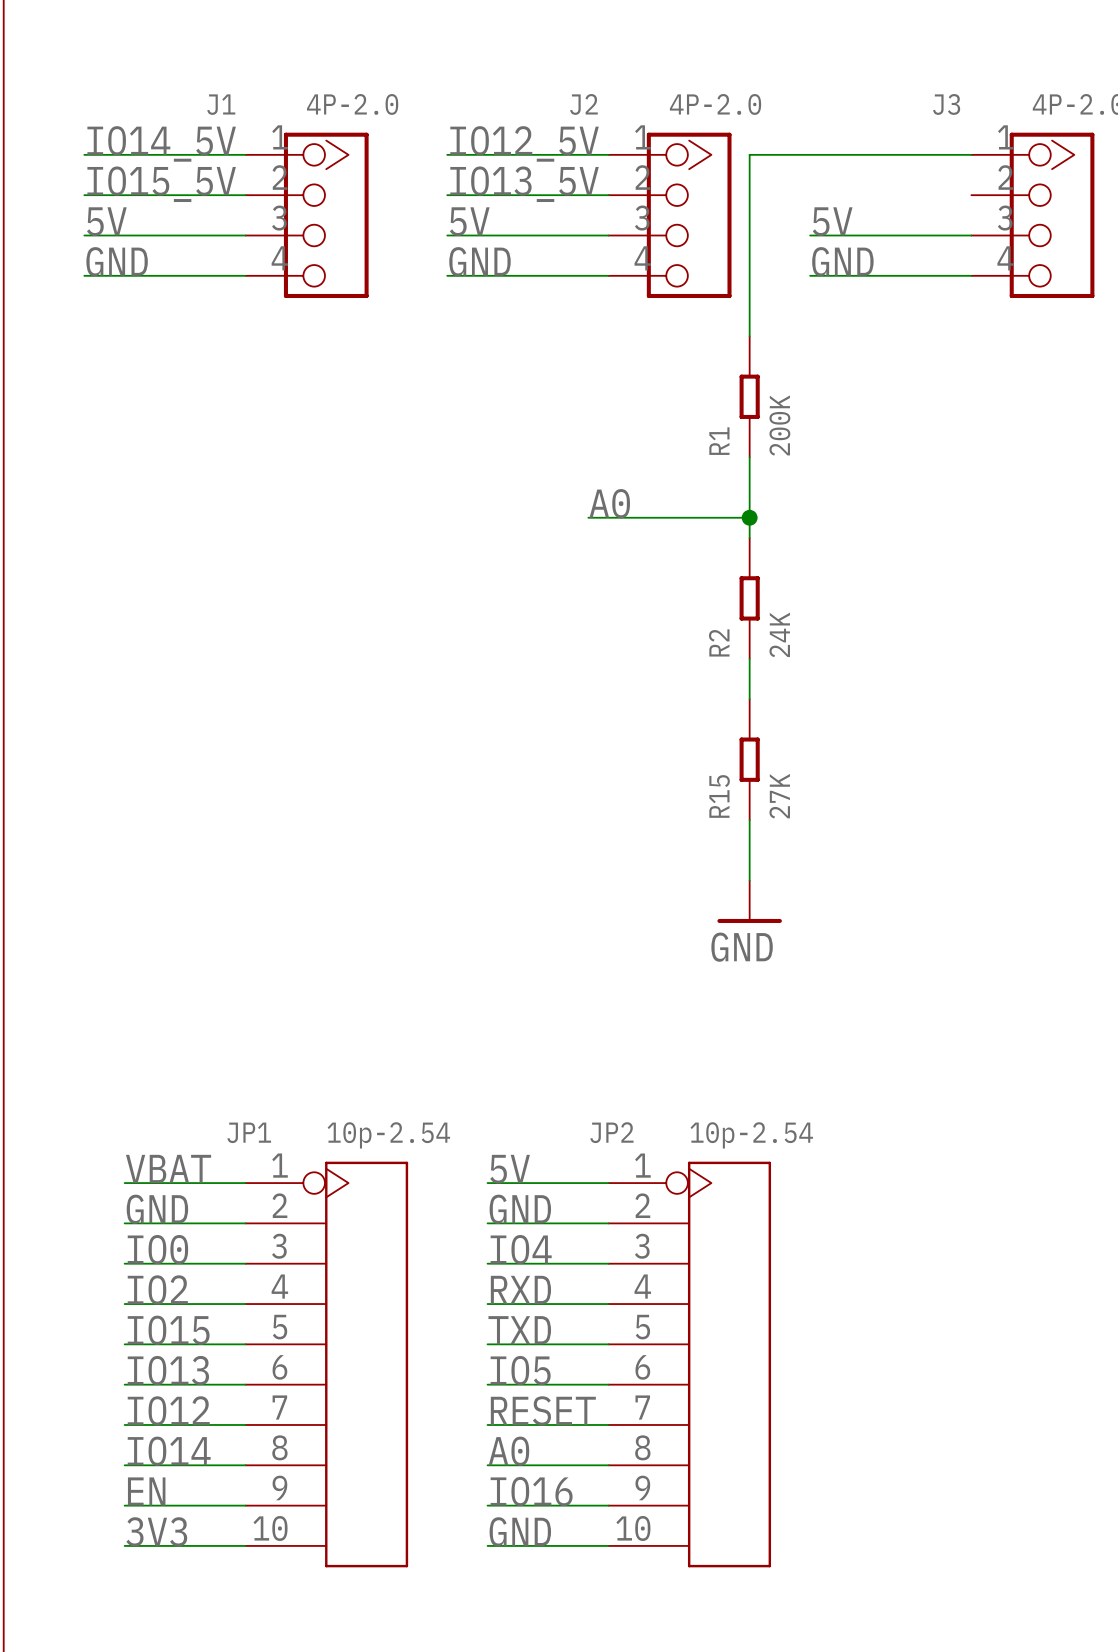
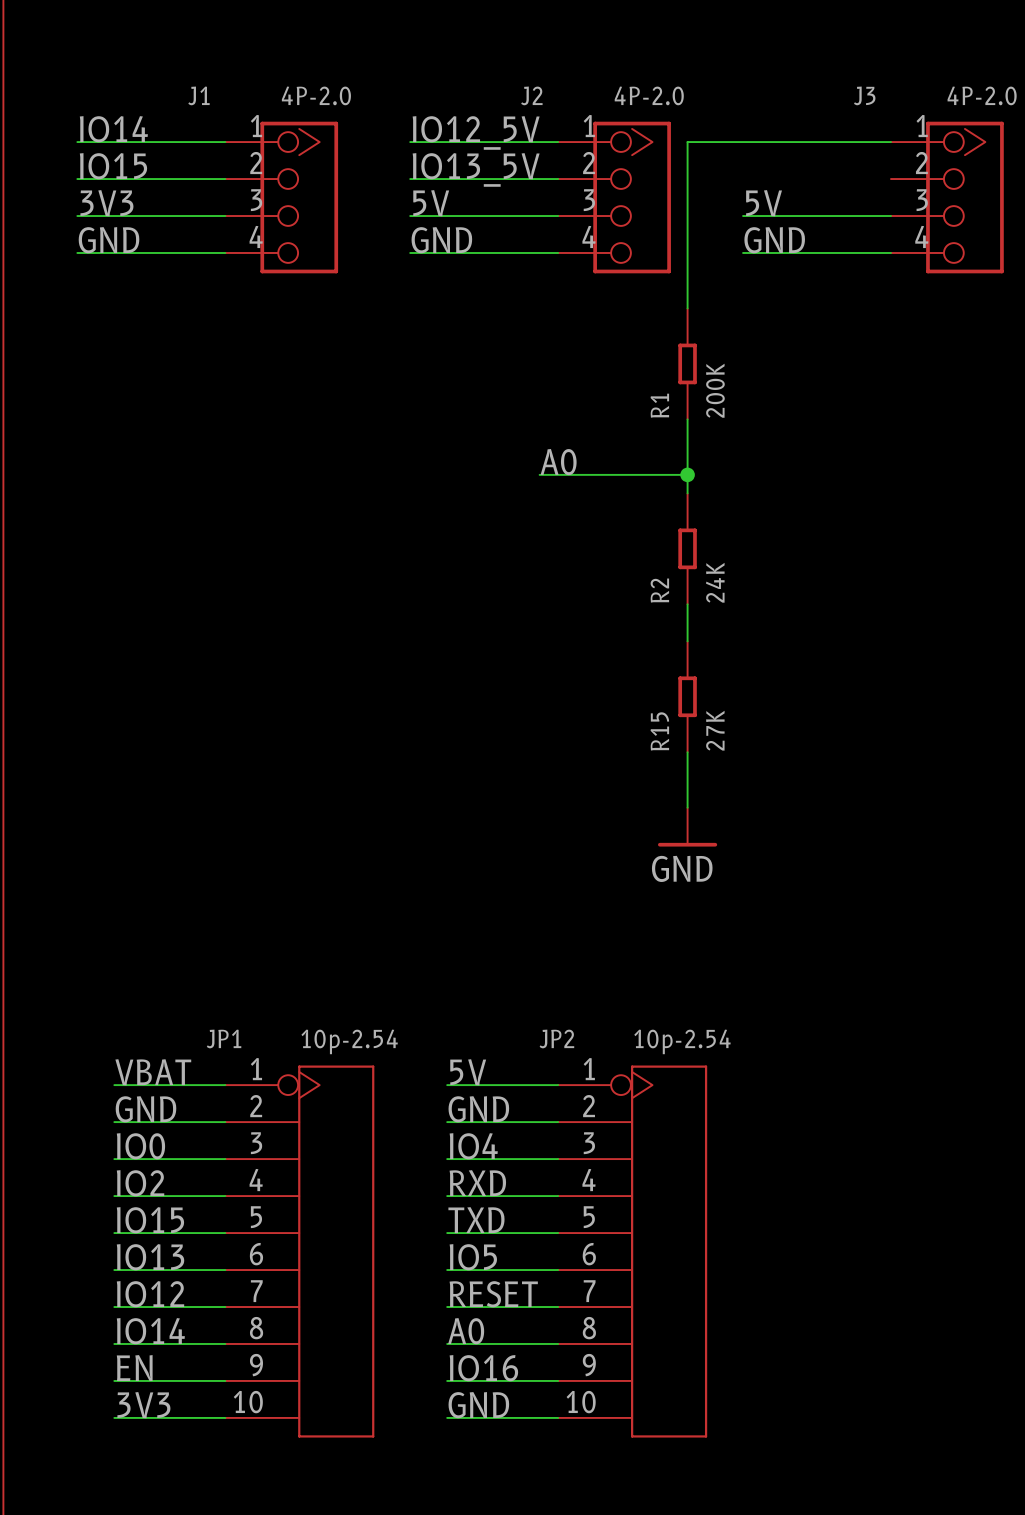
label: IO14_5V (161, 143) -> IO14 (113, 129)
label: IO15_5V (161, 184) -> IO15 (113, 166)
label: 5V (106, 221) -> 3V3 (106, 203)

